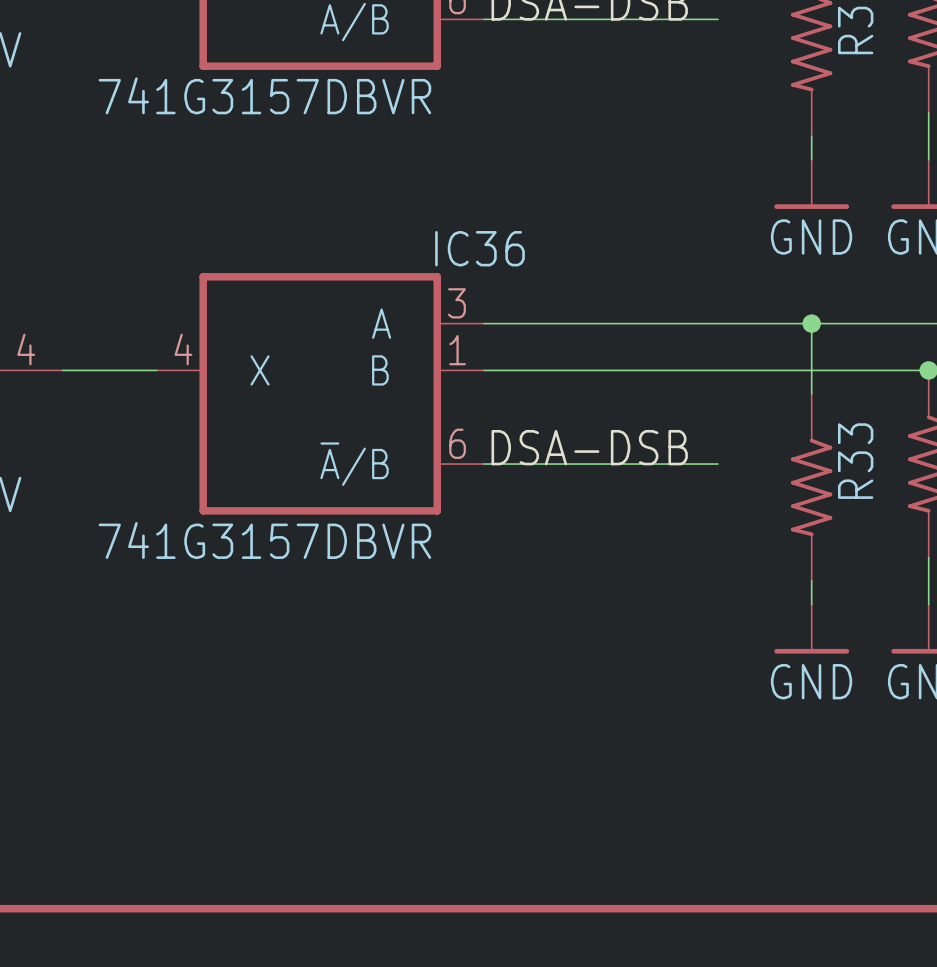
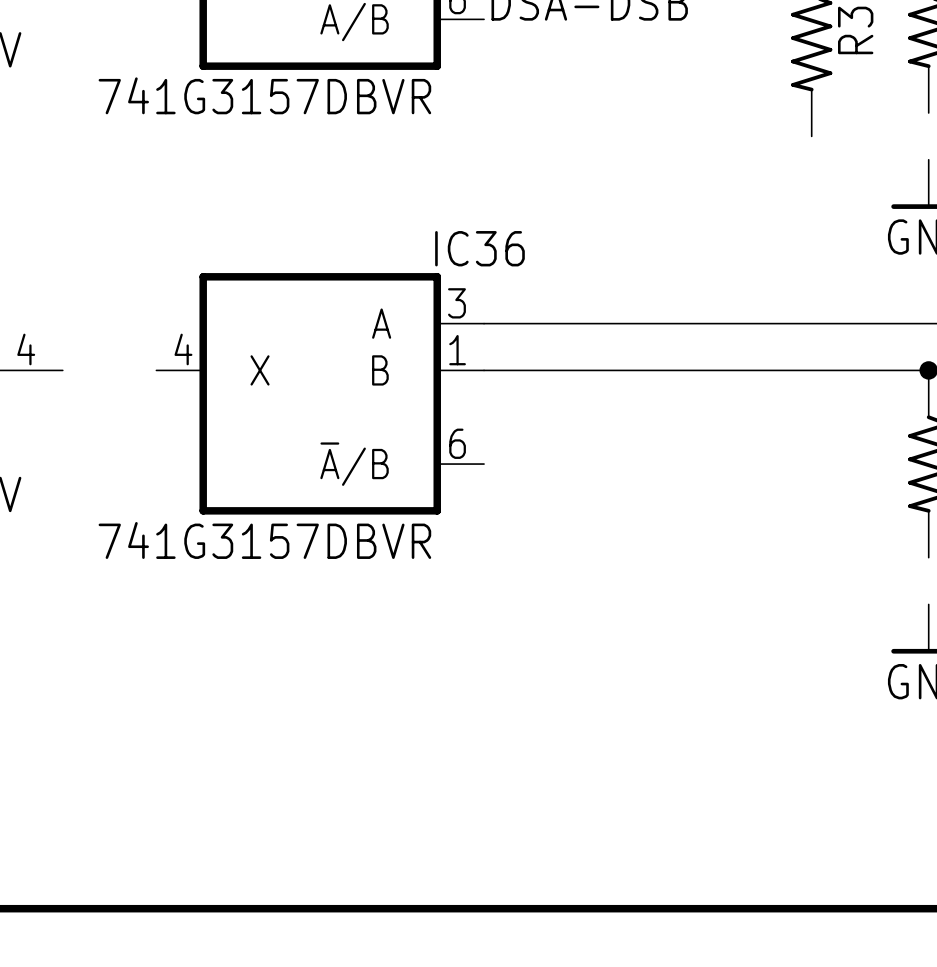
wire: (484, 19) (718, 19) -> none
wire: (928, 112) (928, 159) -> none
wire: (811, 136) (811, 159) -> none
power symbol: GND (811, 184) -> none
wire: (811, 323) (811, 393) -> none
junction: (811, 323) -> none
wire: (62, 370) (156, 370) -> none
label: DSA-DSB (589, 447) -> none
wire: (484, 464) (718, 464) -> none
R33: (811, 487) -> none
wire: (928, 557) (928, 604) -> none
wire: (811, 581) (811, 604) -> none
power symbol: GND (811, 629) -> none

